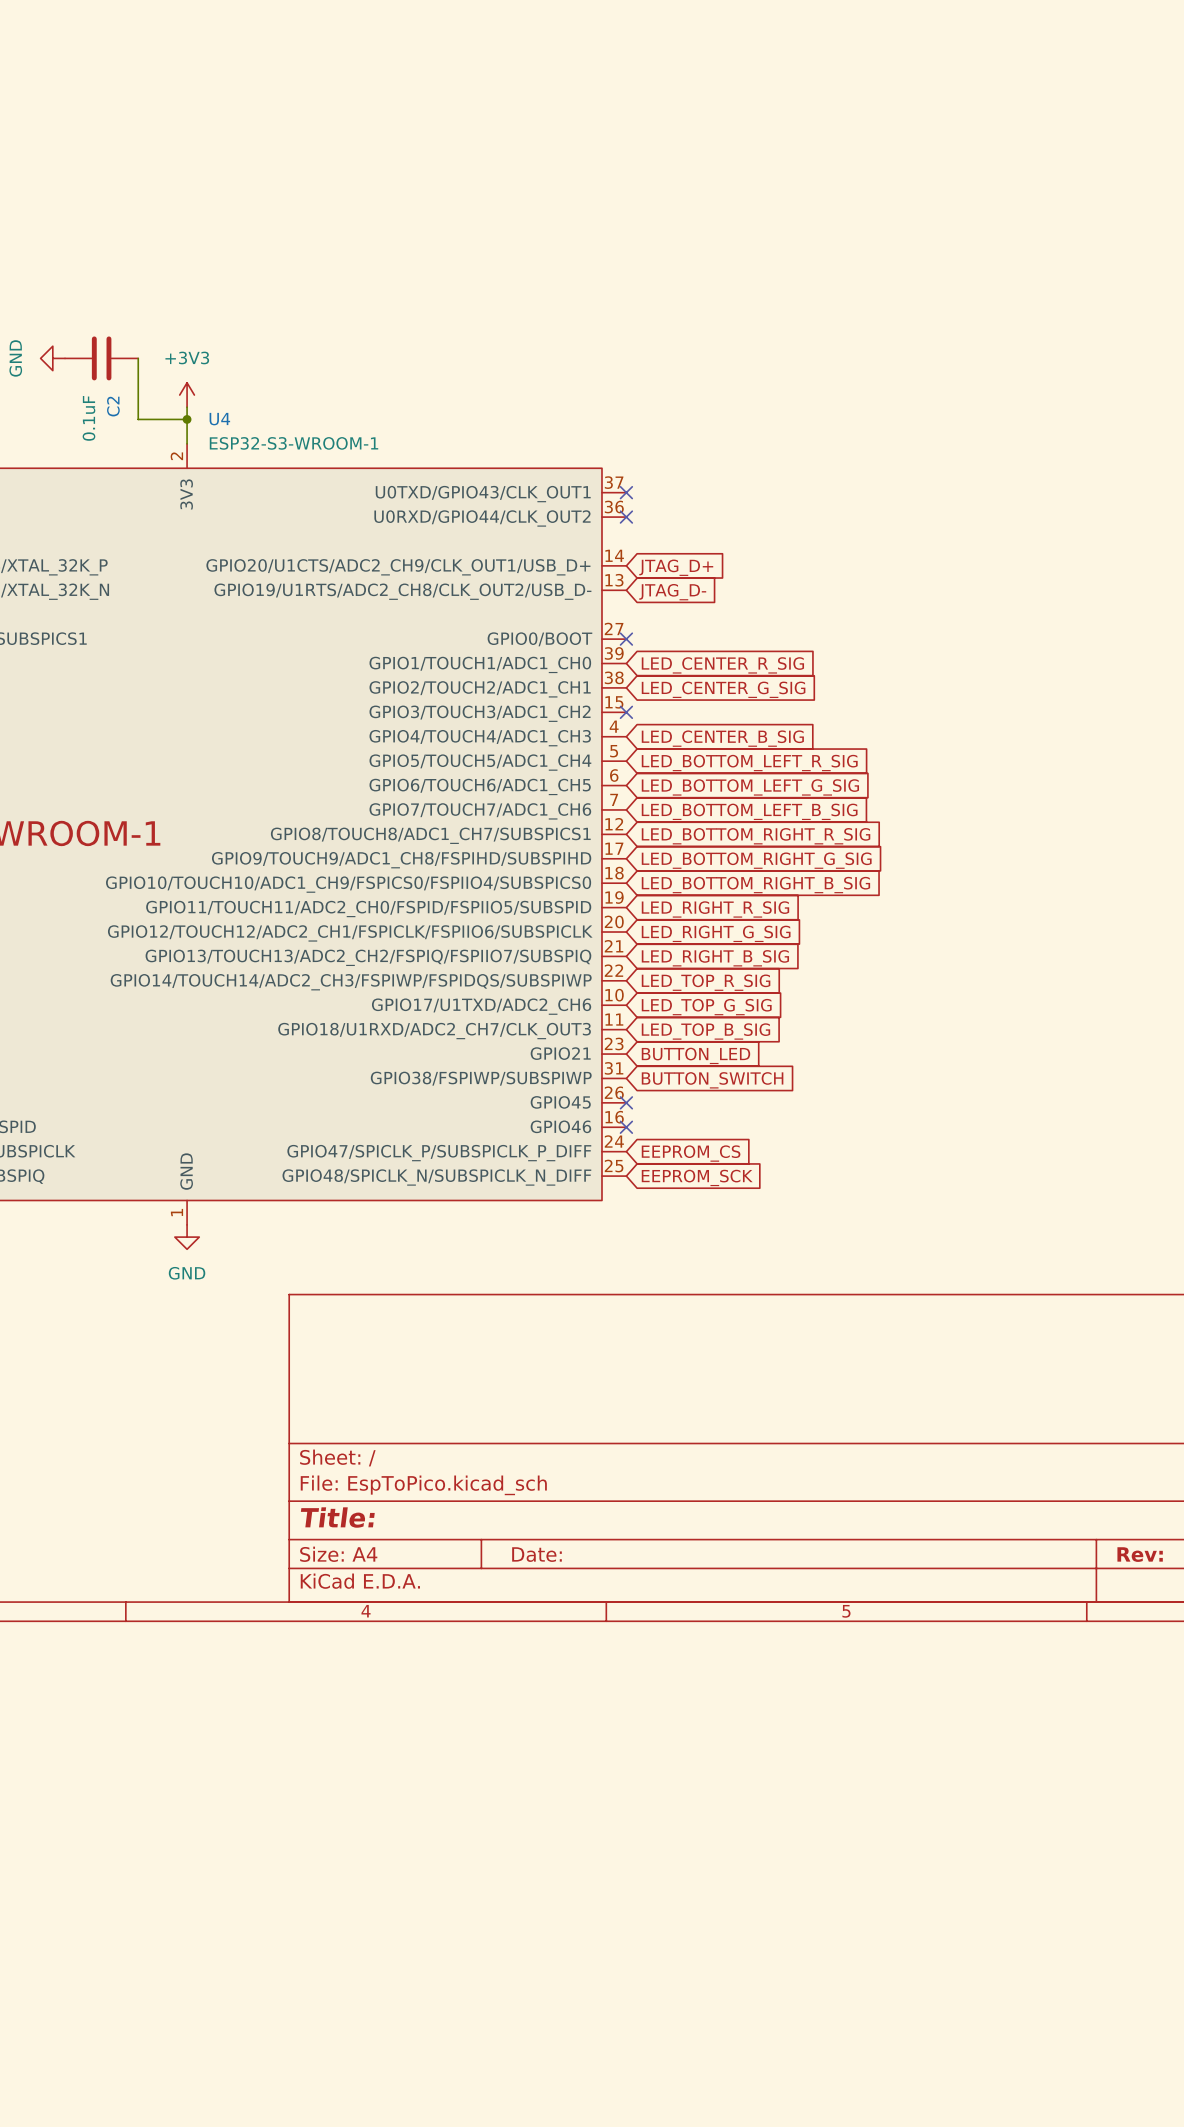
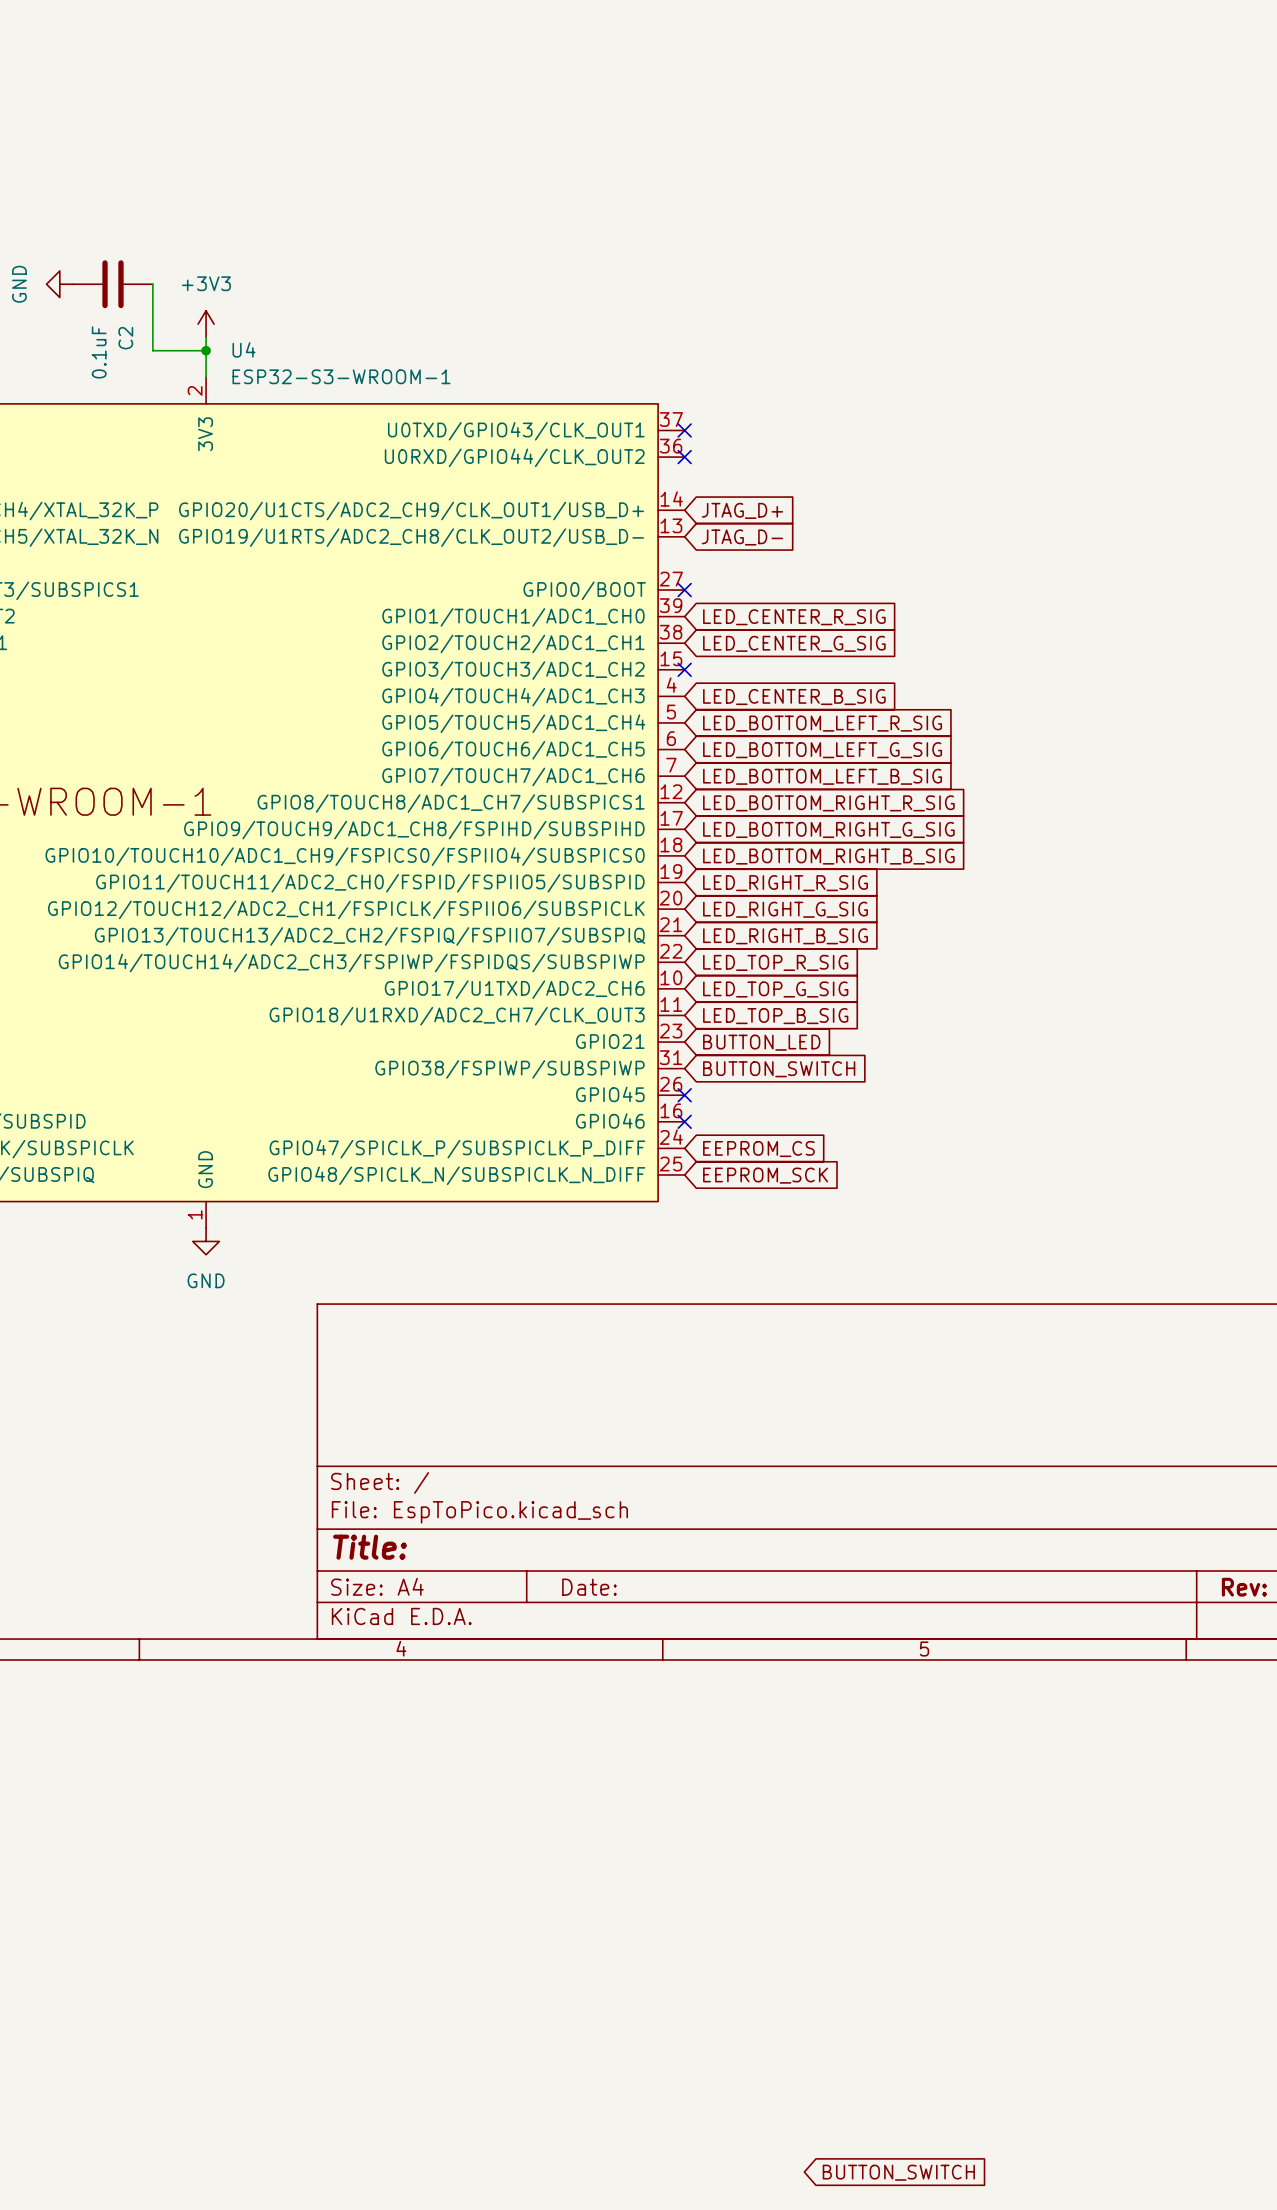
global label: none -> BUTTON_SWITCH (898, 2172)

